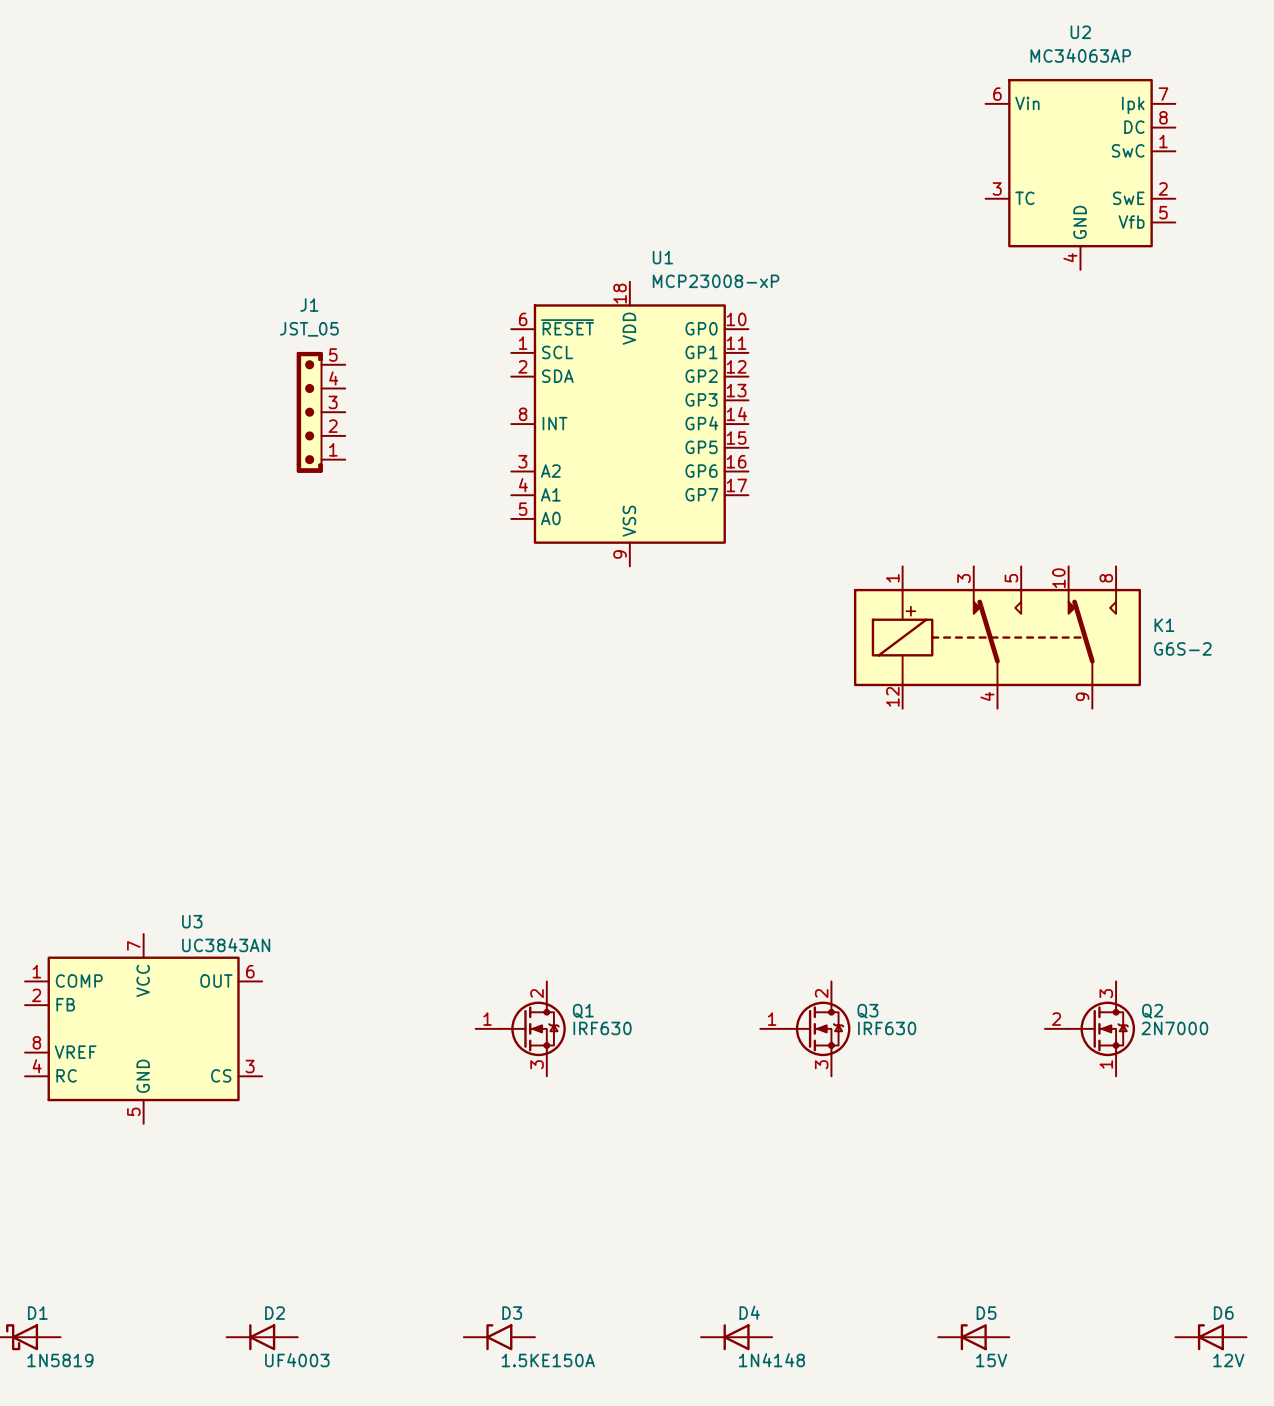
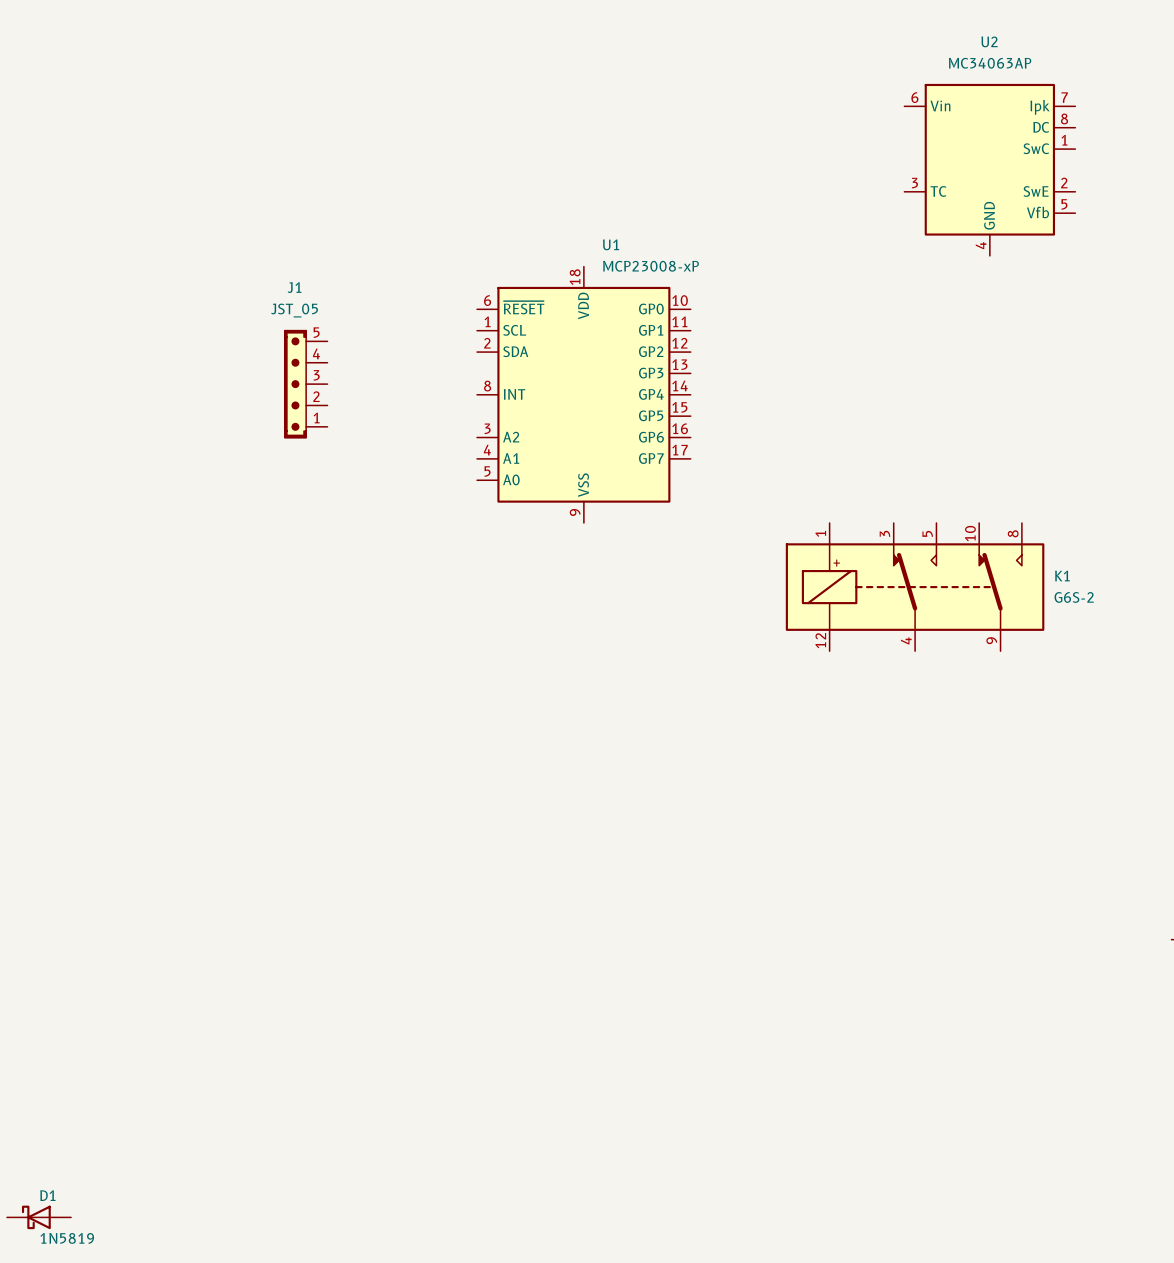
U3: UC3843AN (143, 1028) -> none
Q1: IRF630 (520, 1028) -> none
Q3: IRF630 (805, 1028) -> none
Q2: 2N7000 (1089, 1028) -> none
D2: UF4003 (262, 1337) -> none
D3: 1.5KE150A (499, 1337) -> none
D4: 1N4148 (736, 1337) -> none
D5: 15V (973, 1337) -> none
D6: 12V (1210, 1337) -> none

